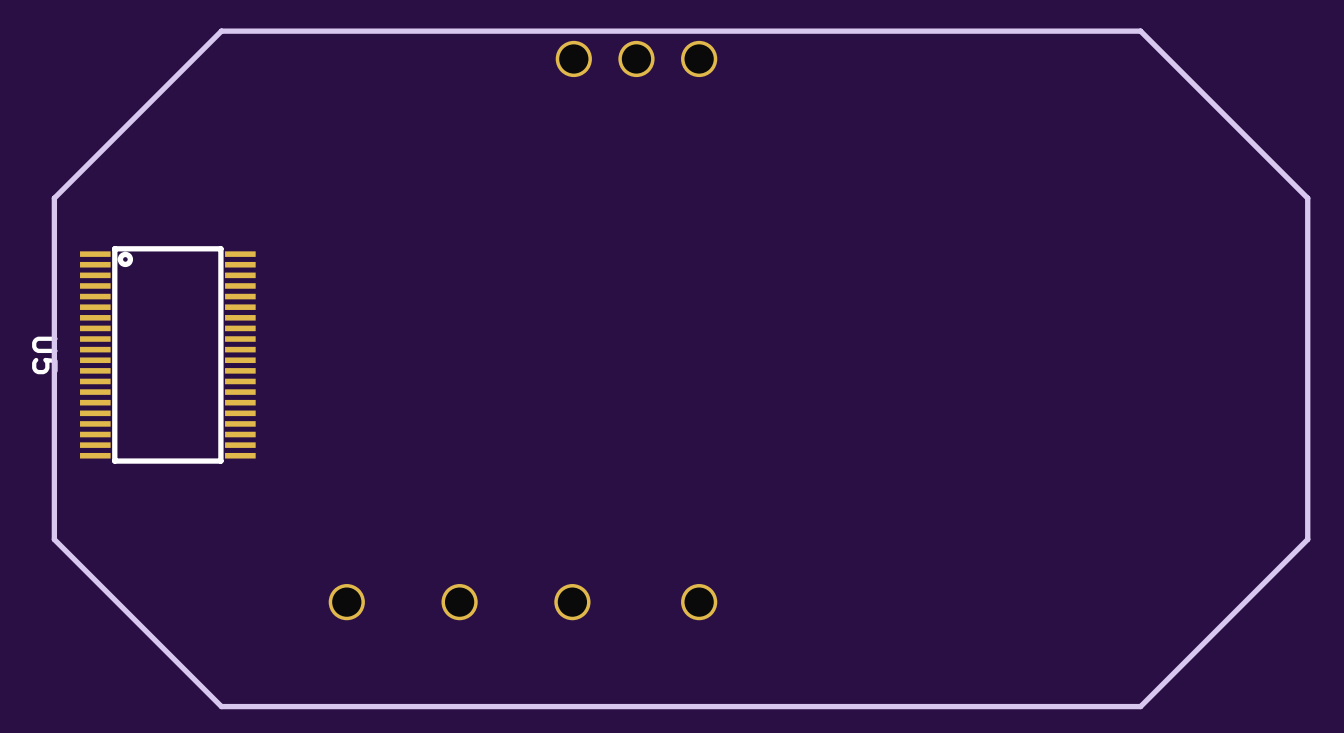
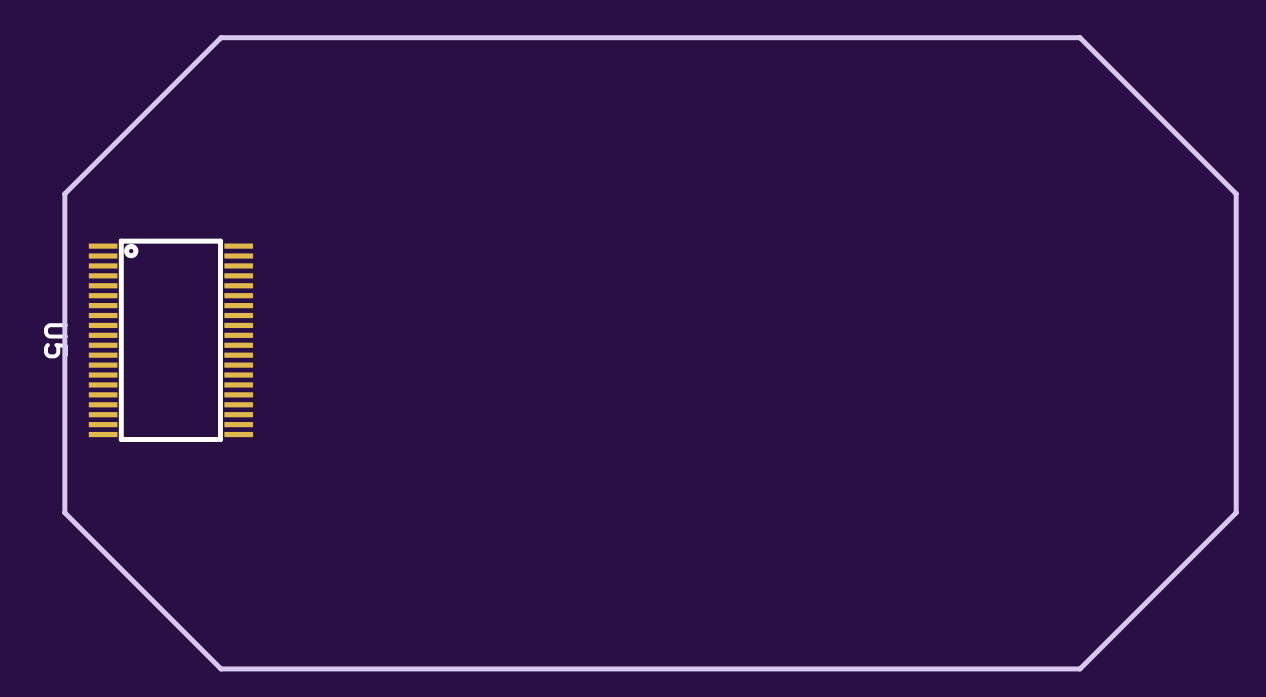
part: (573, 58) -> none
part: (636, 58) -> none
part: (699, 58) -> none
part: (346, 602) -> none
part: (459, 602) -> none
part: (572, 602) -> none
part: (699, 602) -> none

